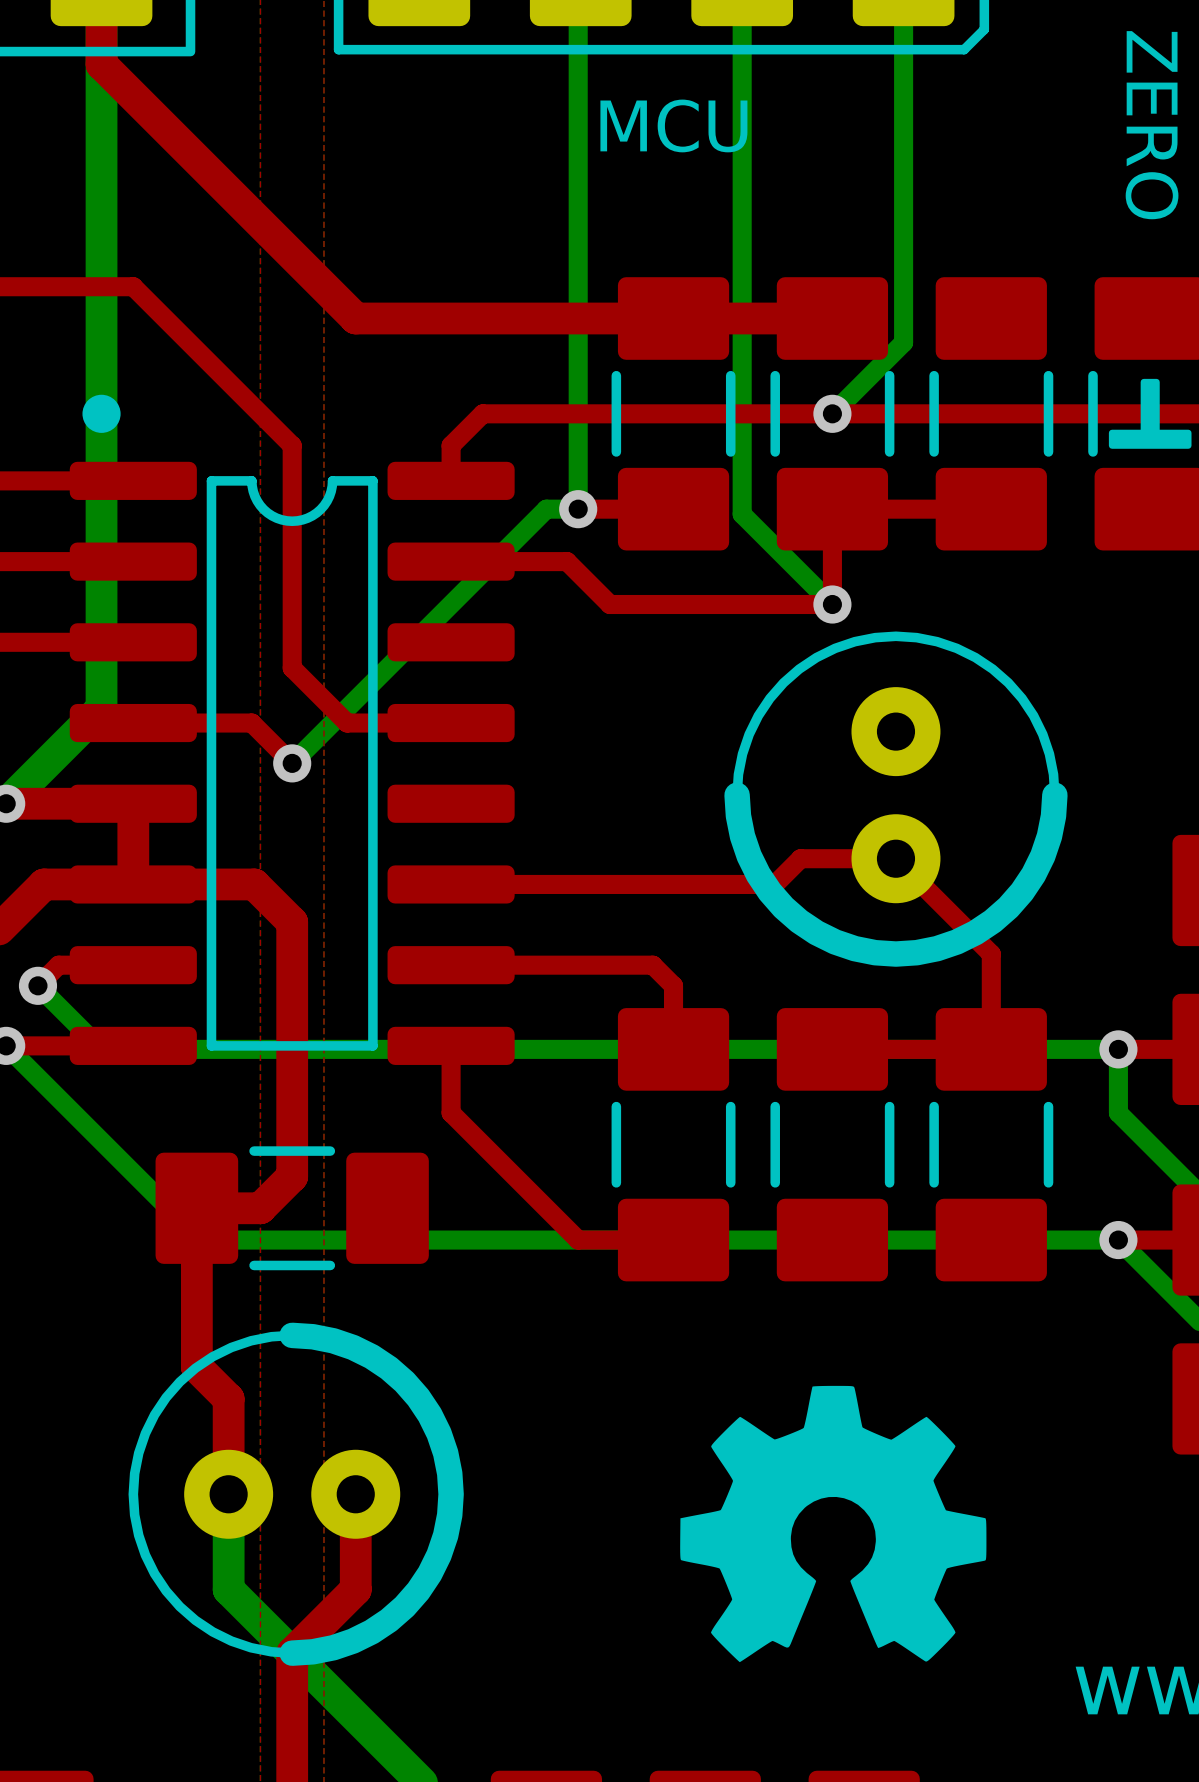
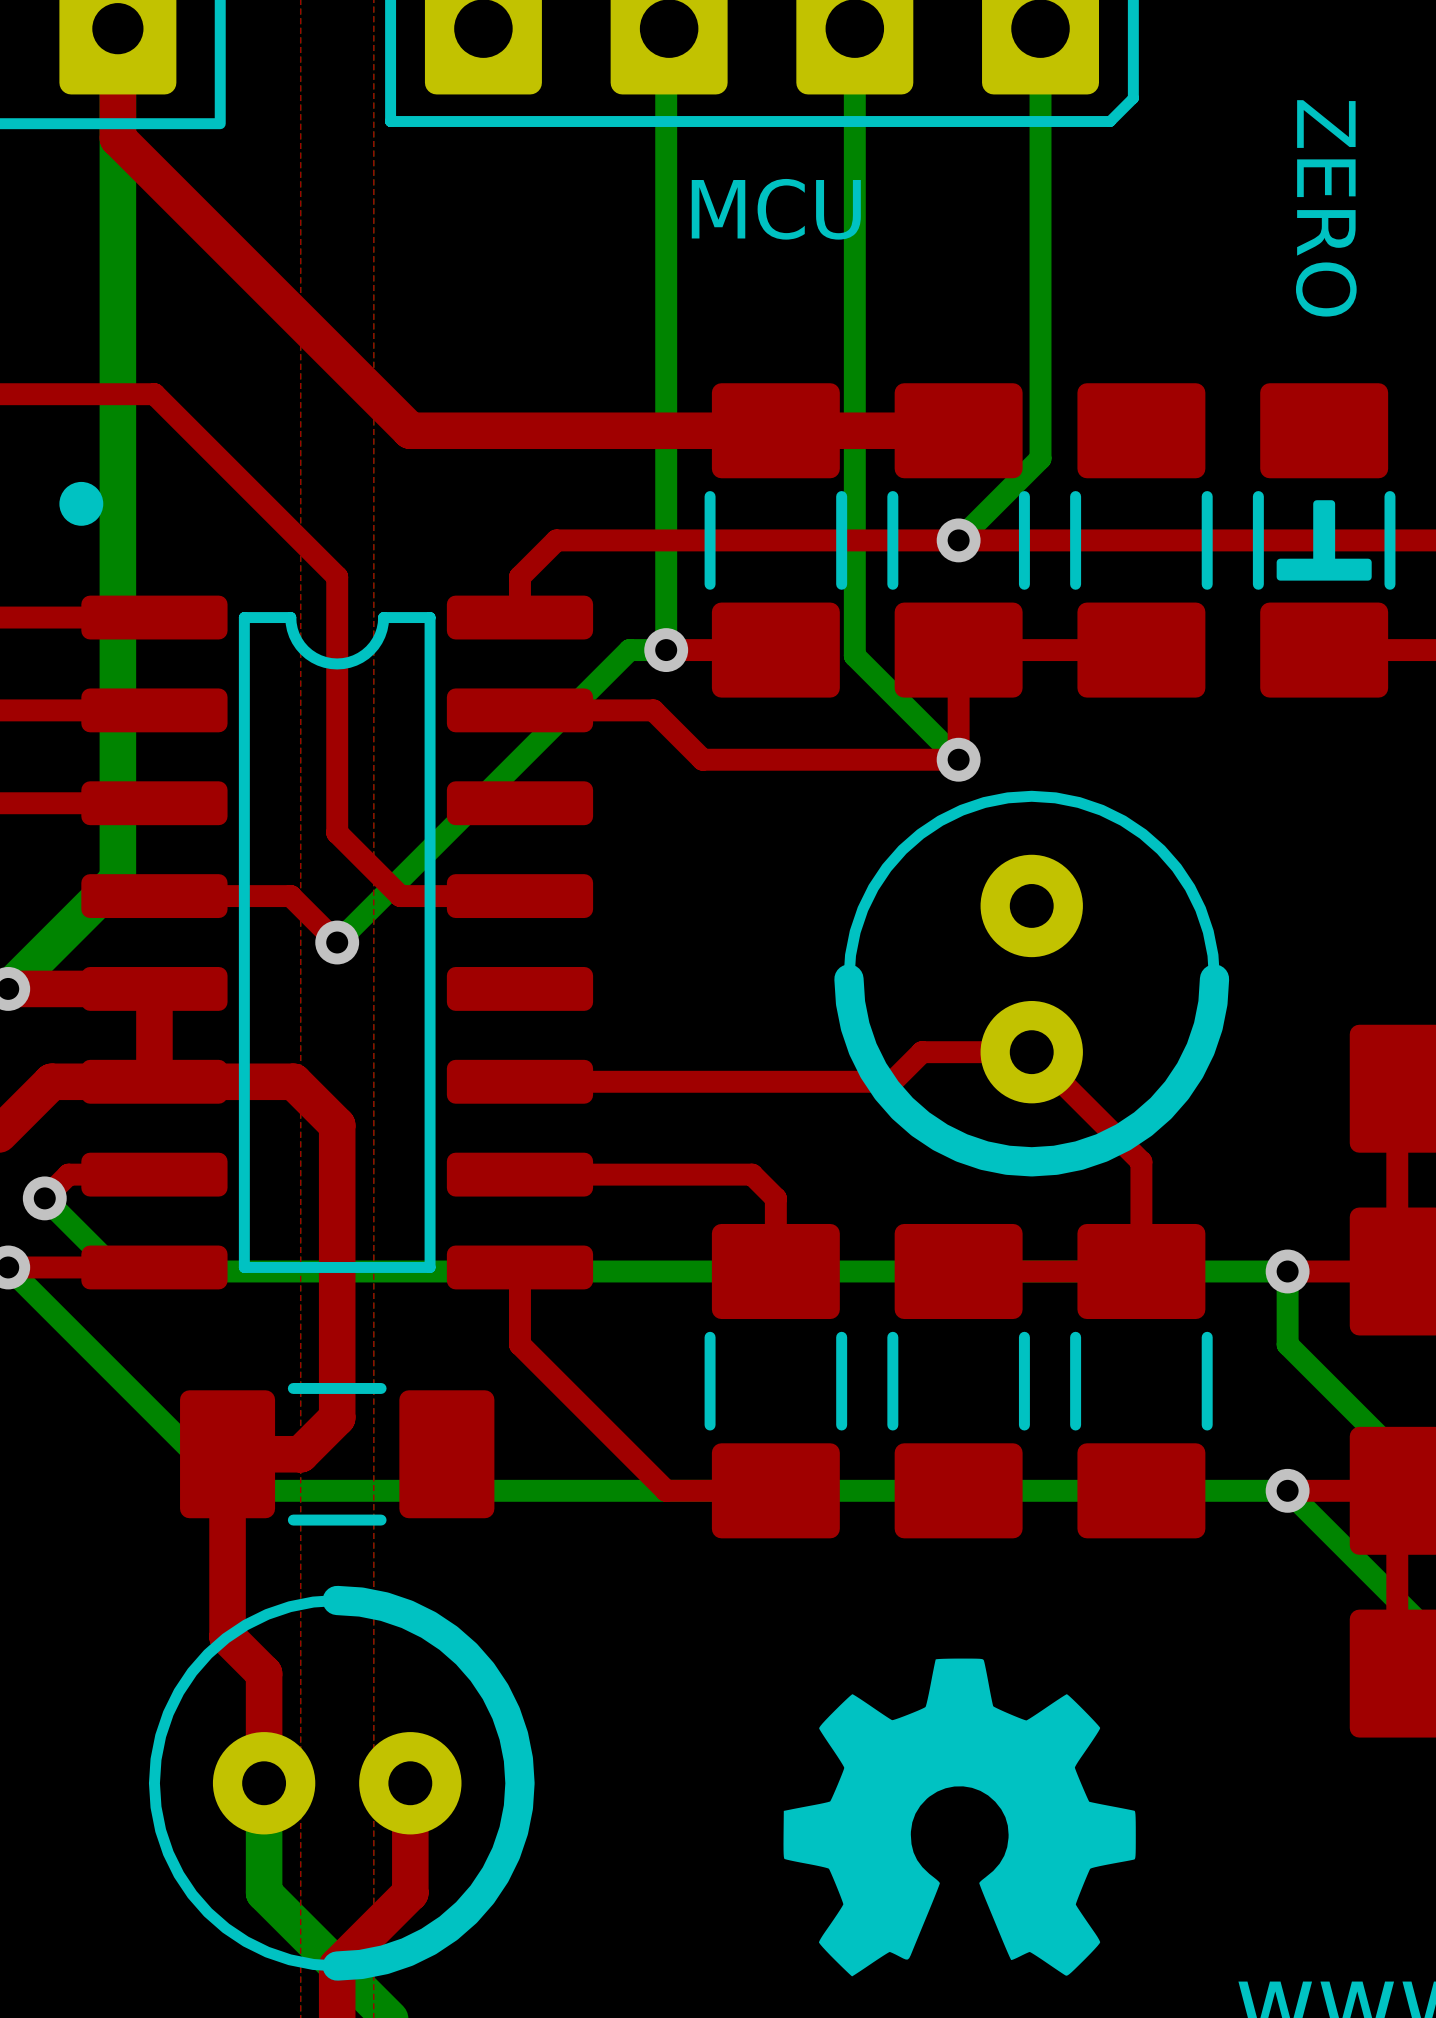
drawing position: (101, 413) -> (81, 503)

